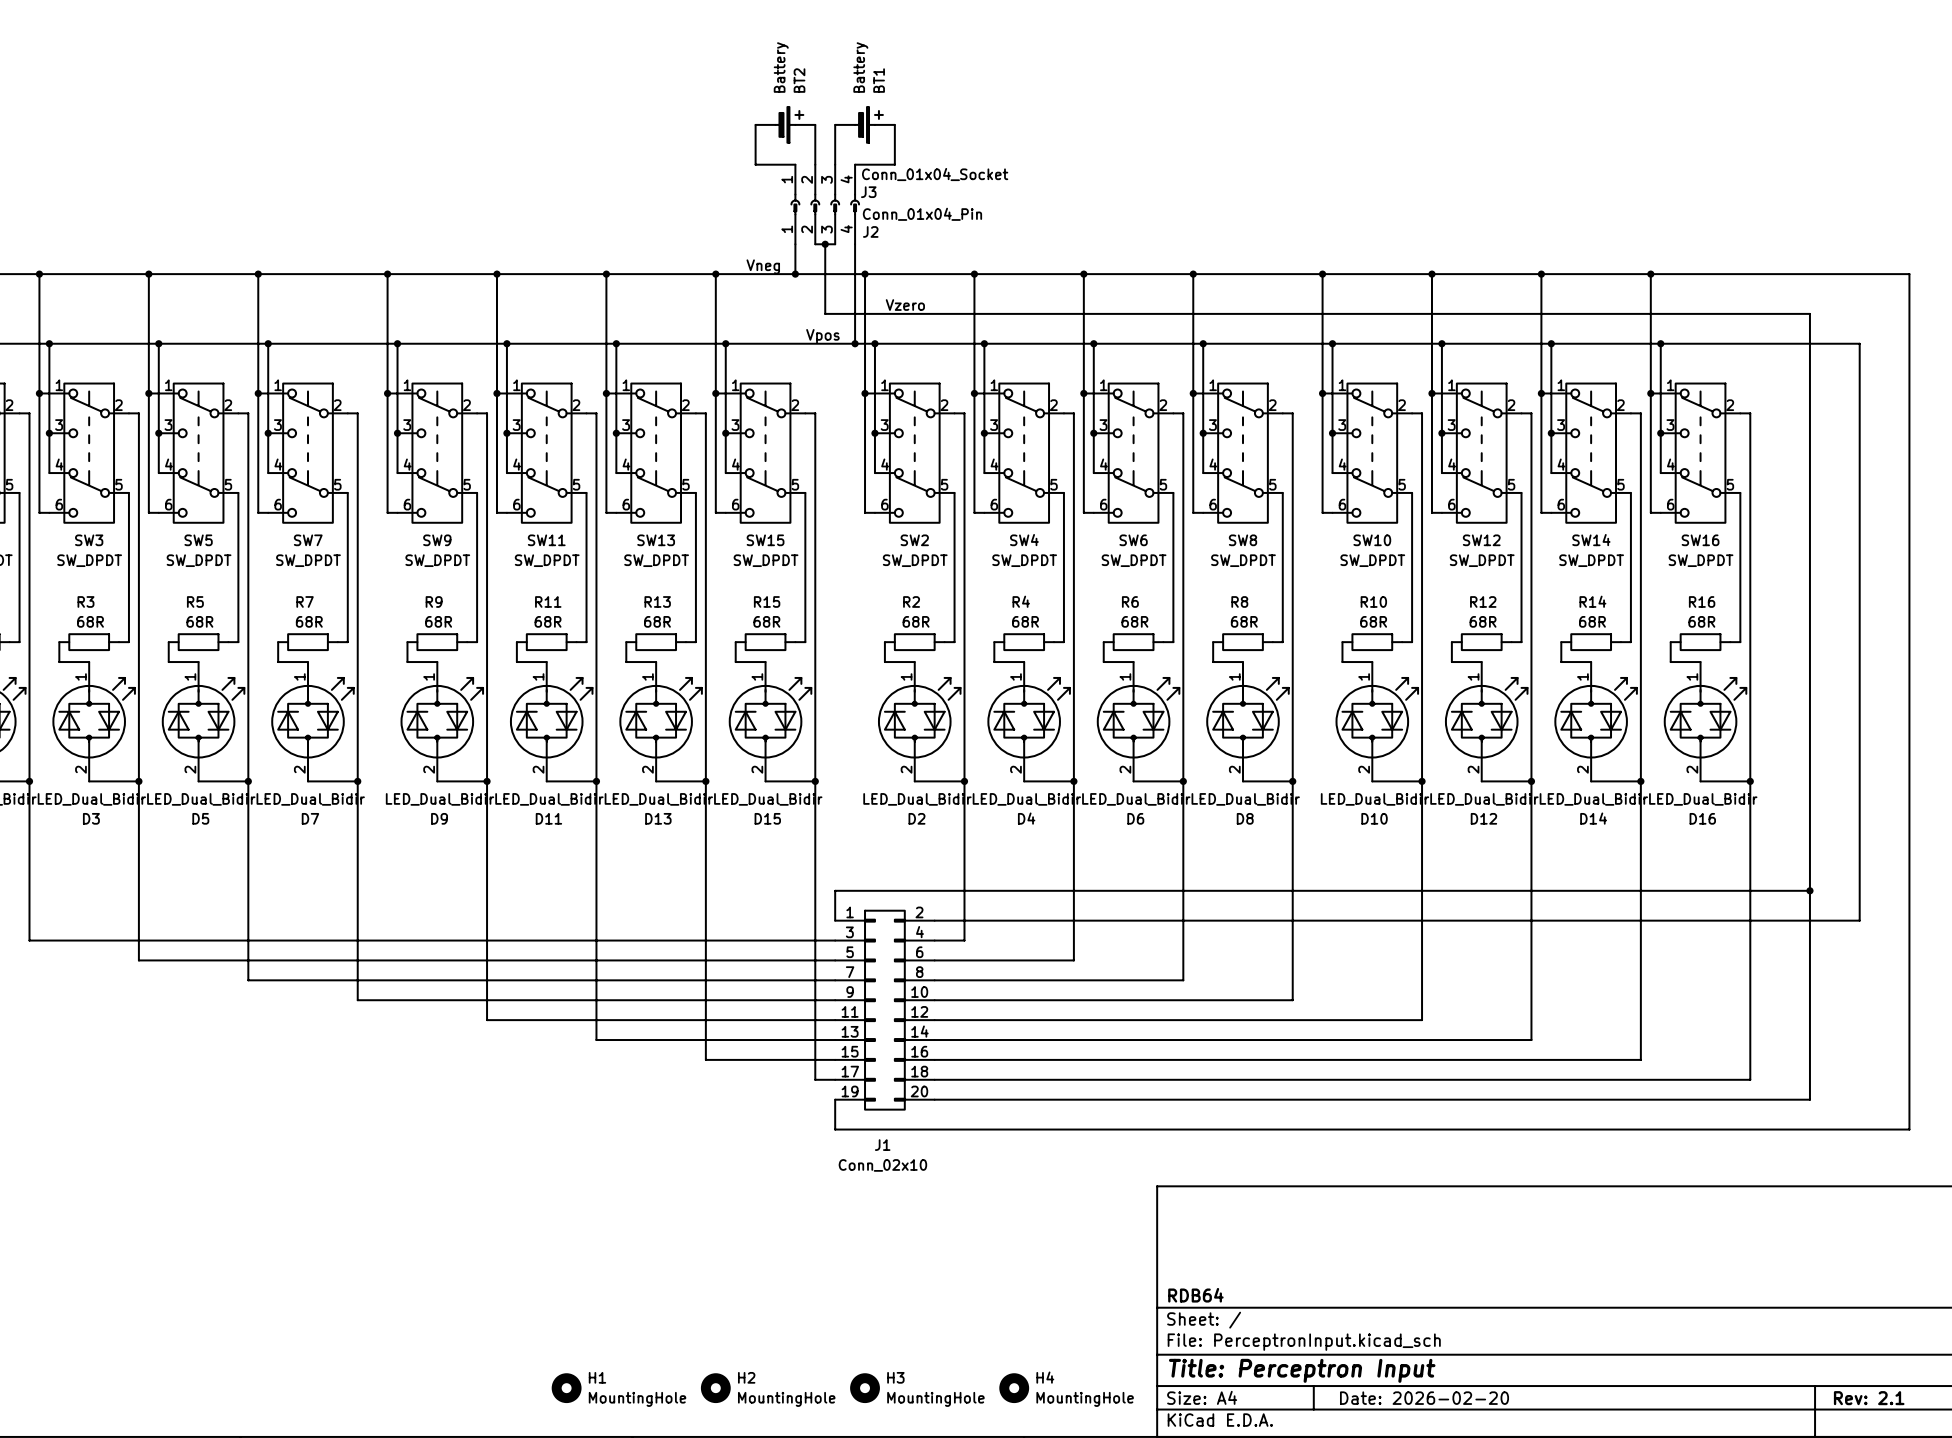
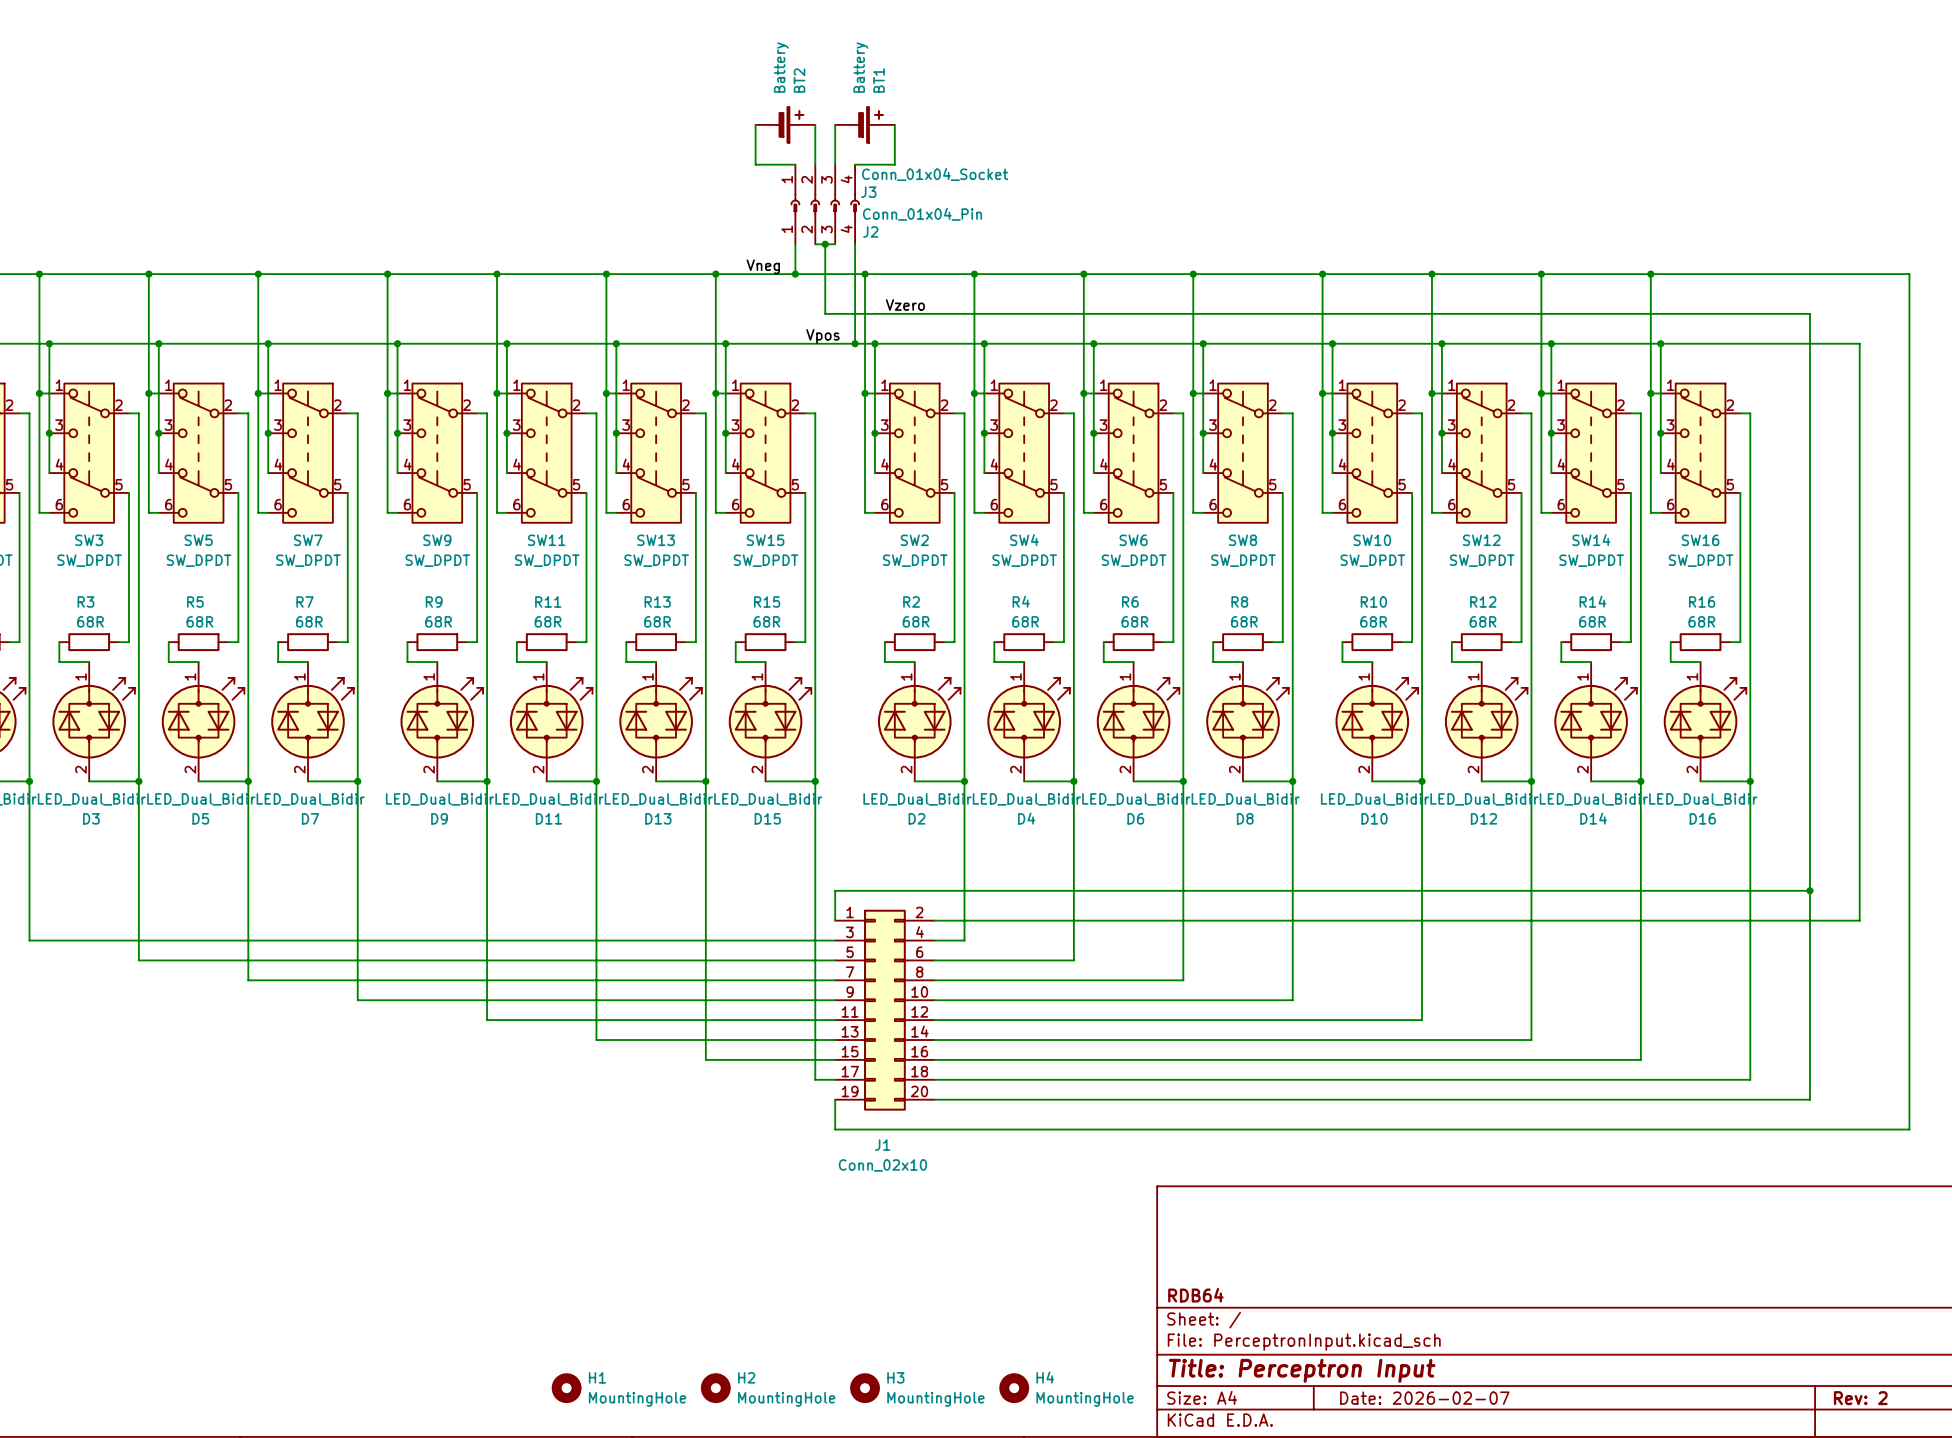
title block: Date: 2026-02-20 (1424, 1398) -> Date: 2026-02-07 (1424, 1398)
title block: Rev: 2.1 (1869, 1398) -> Rev: 2 (1860, 1398)

